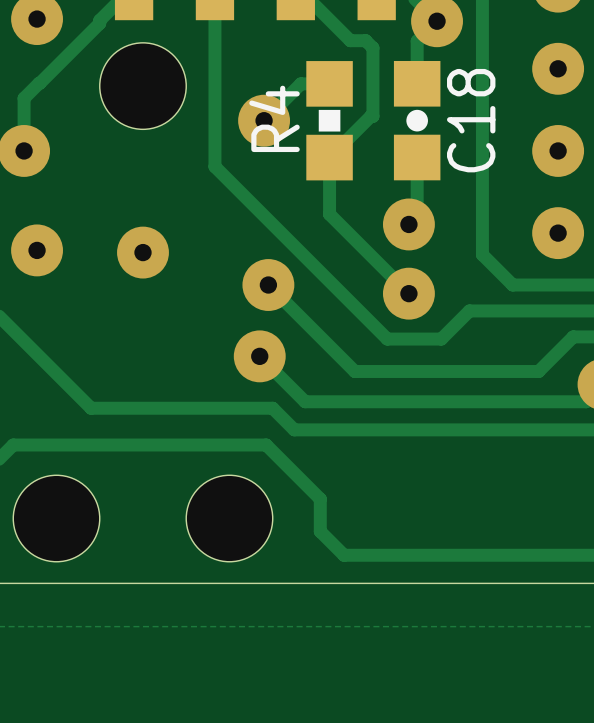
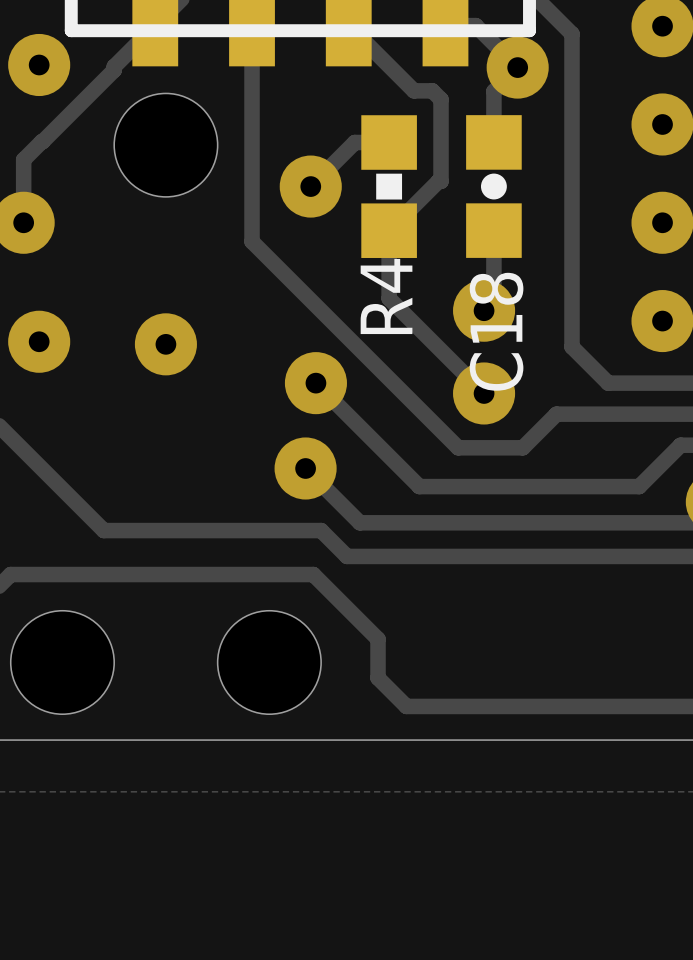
R4 name position: R4 (274, 118) -> R4 (386, 296)
C18 name position: C18 (471, 120) -> C18 (496, 331)

